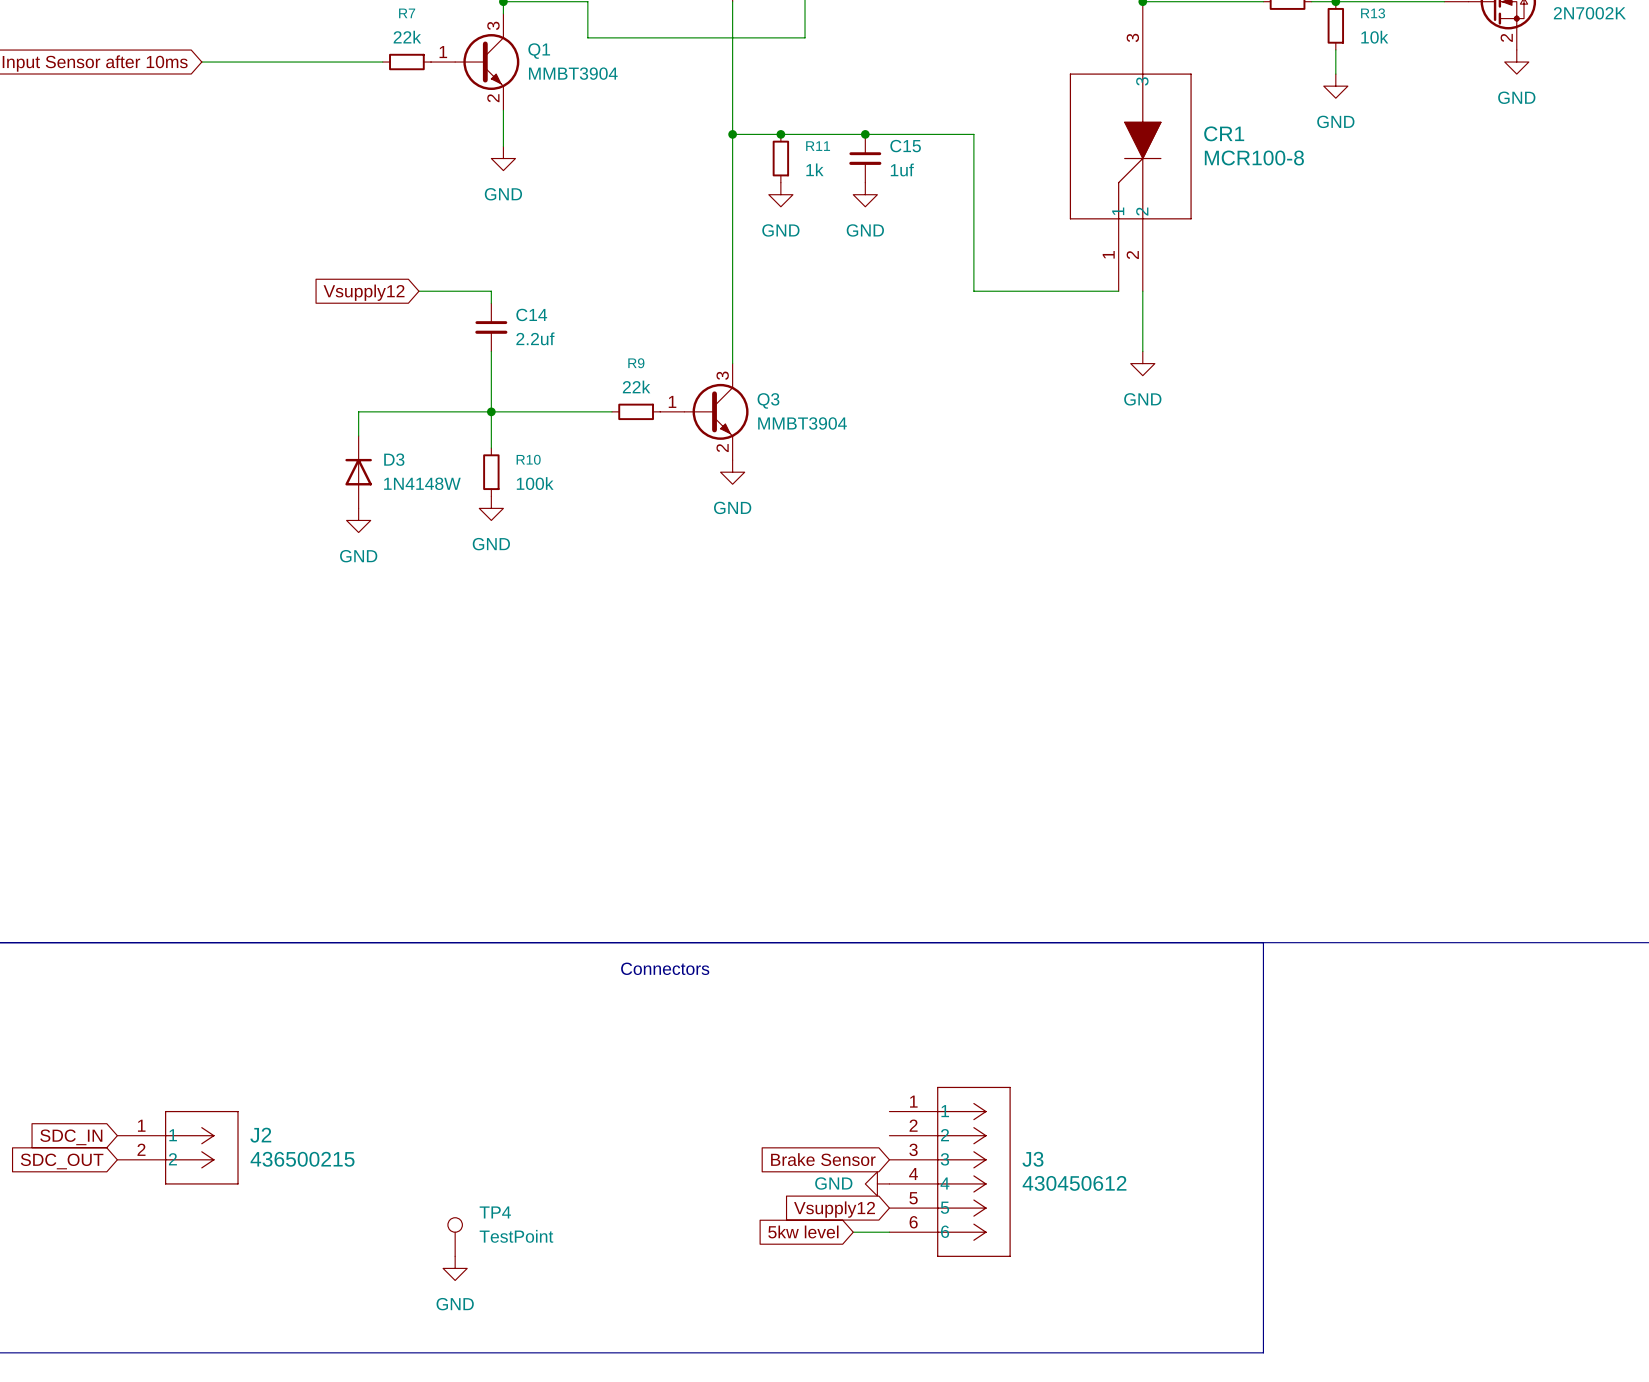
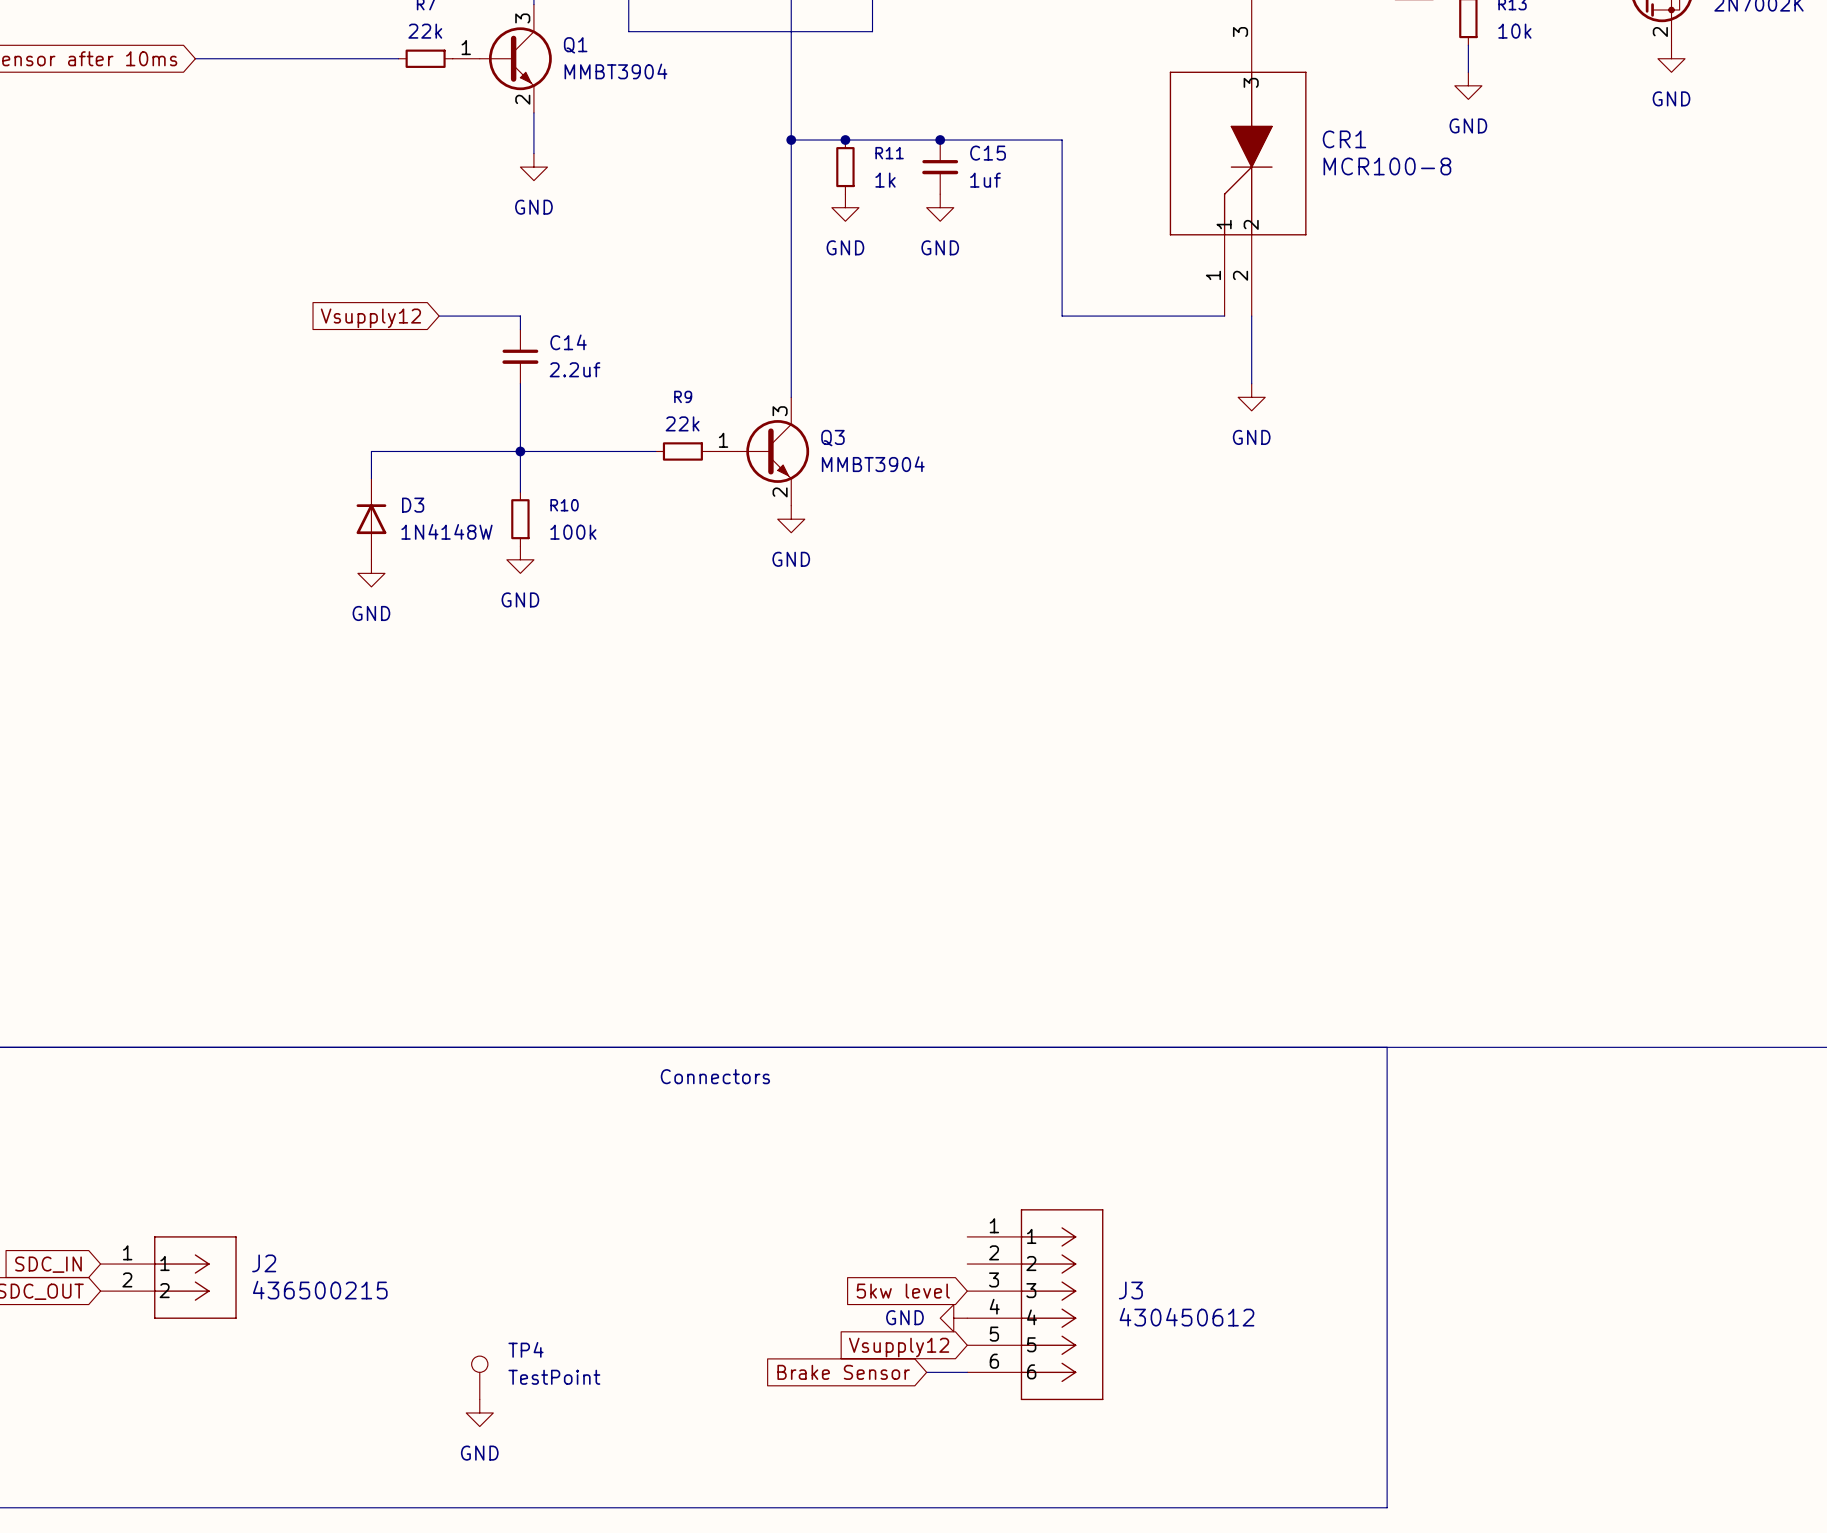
global label: Brake Sensor (823, 1159) -> 5kw level (903, 1291)
global label: 5kw level (803, 1231) -> Brake Sensor (843, 1372)

